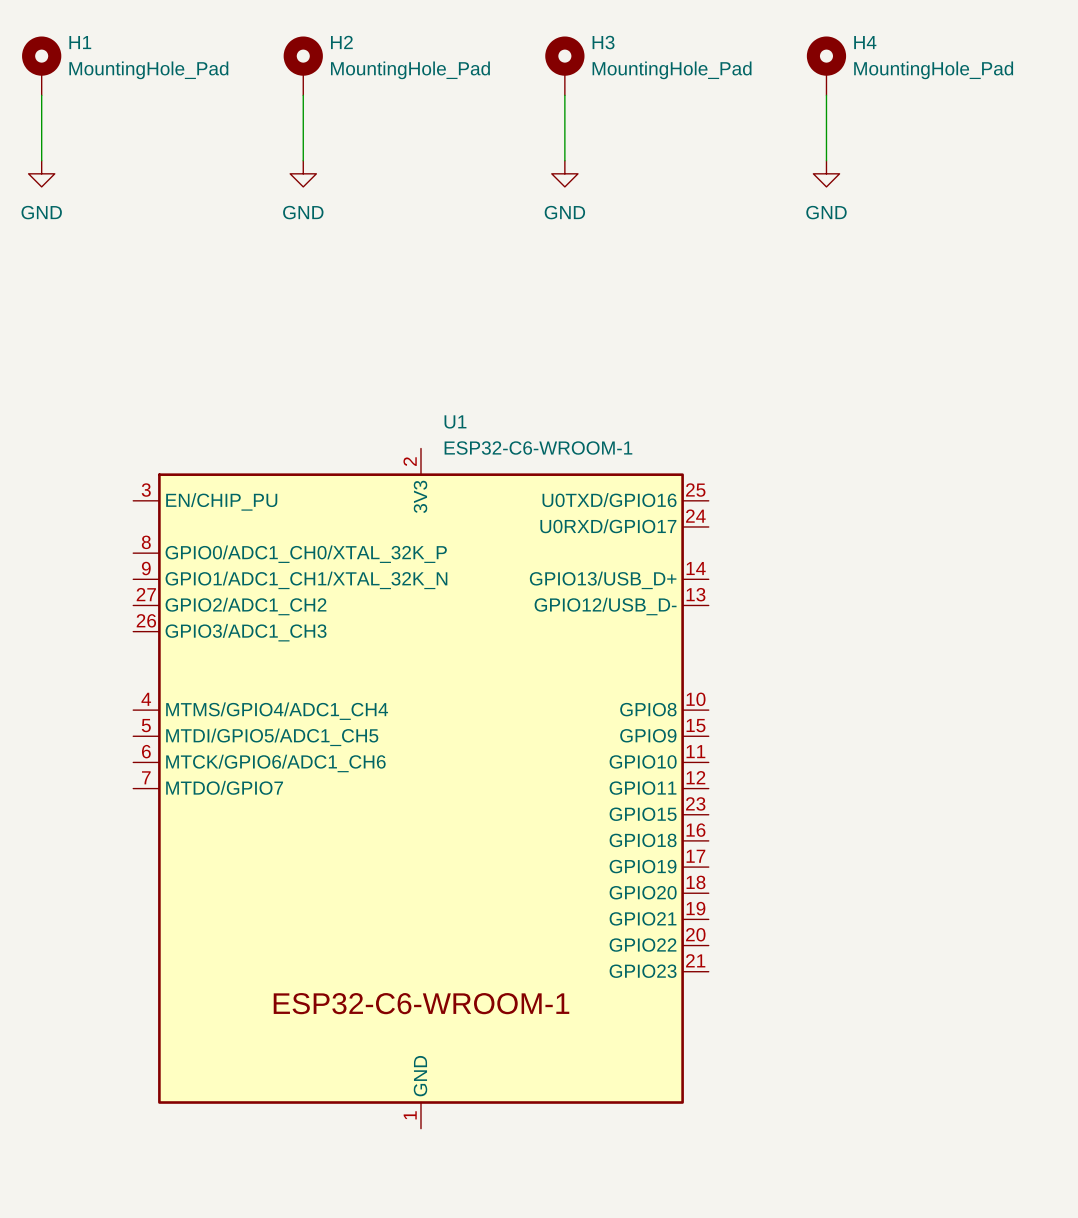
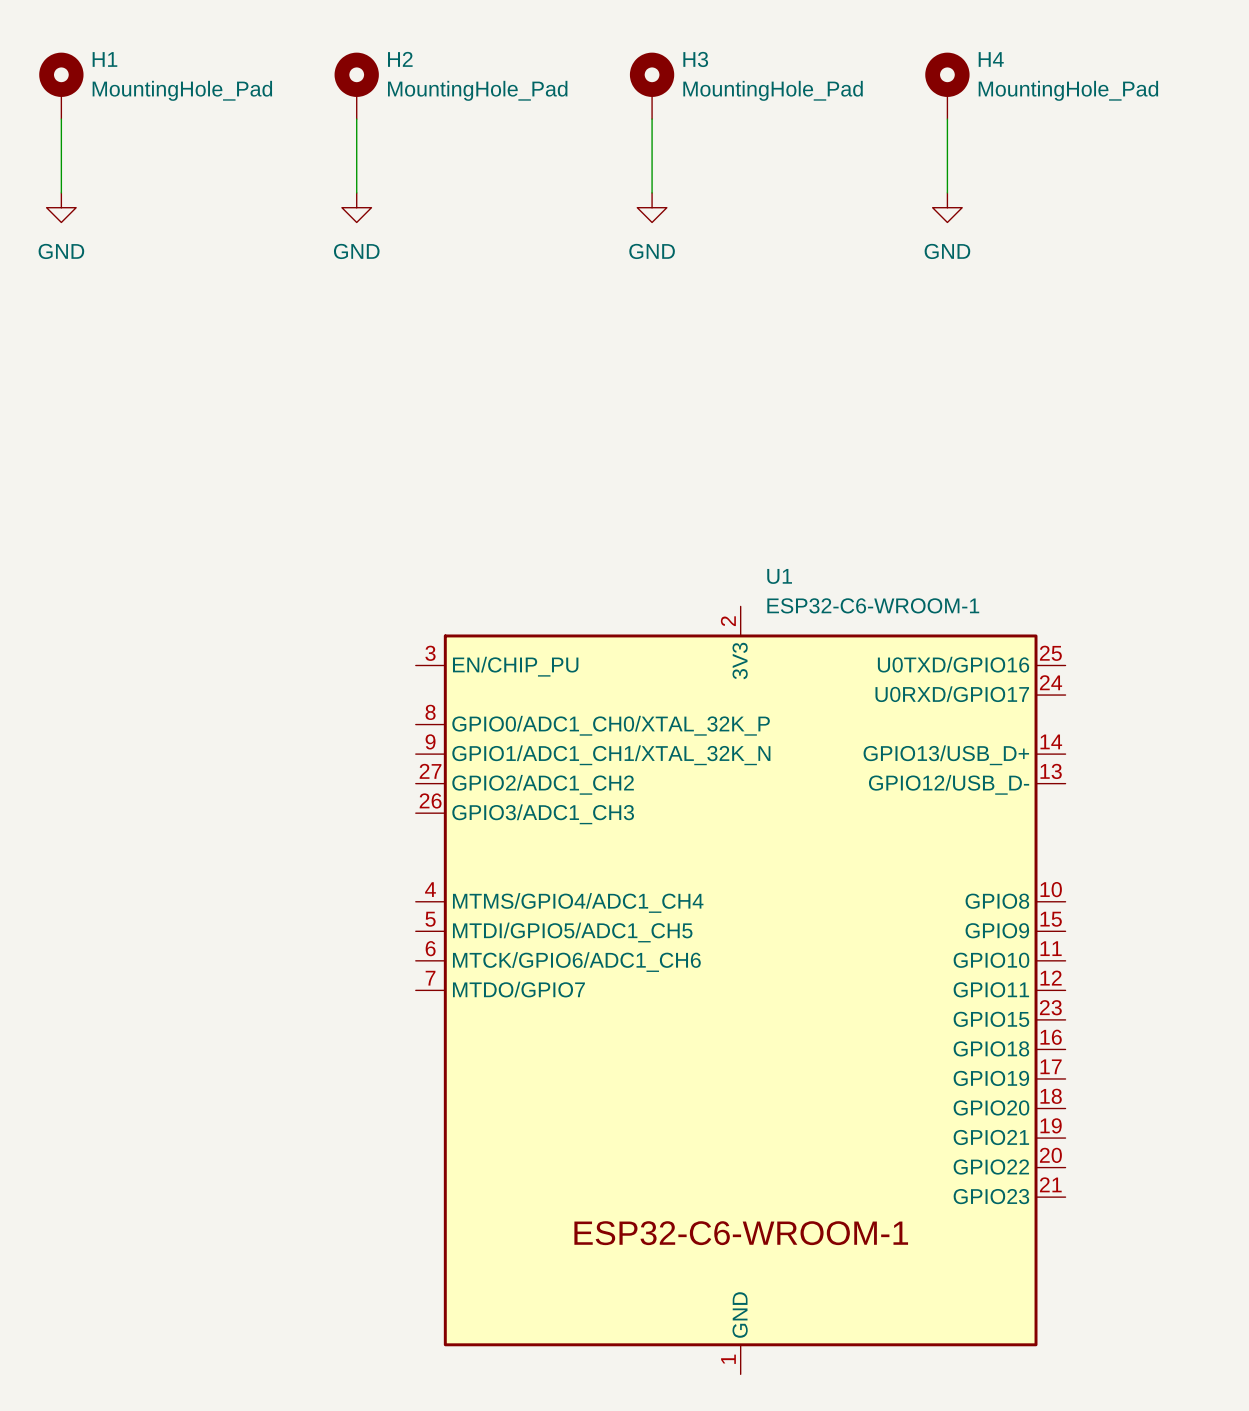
U1 position: (420, 788) -> (740, 990)

